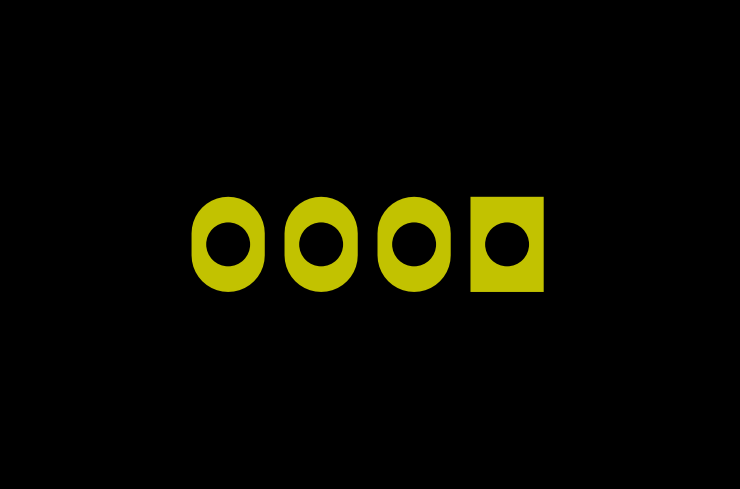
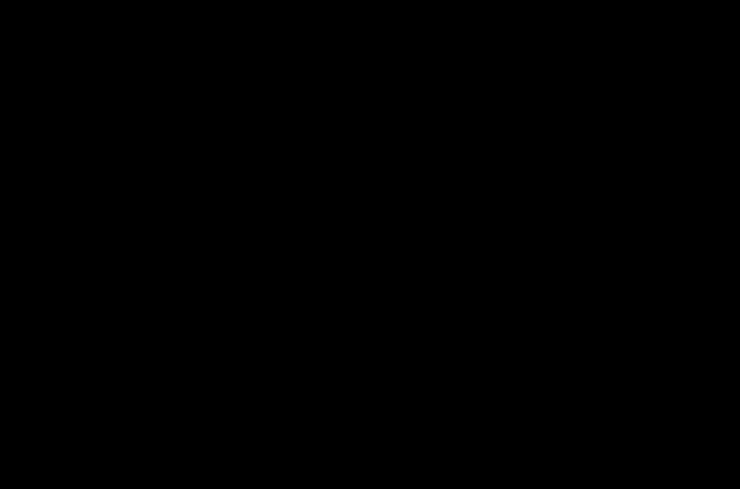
part: (367, 244) -> none

